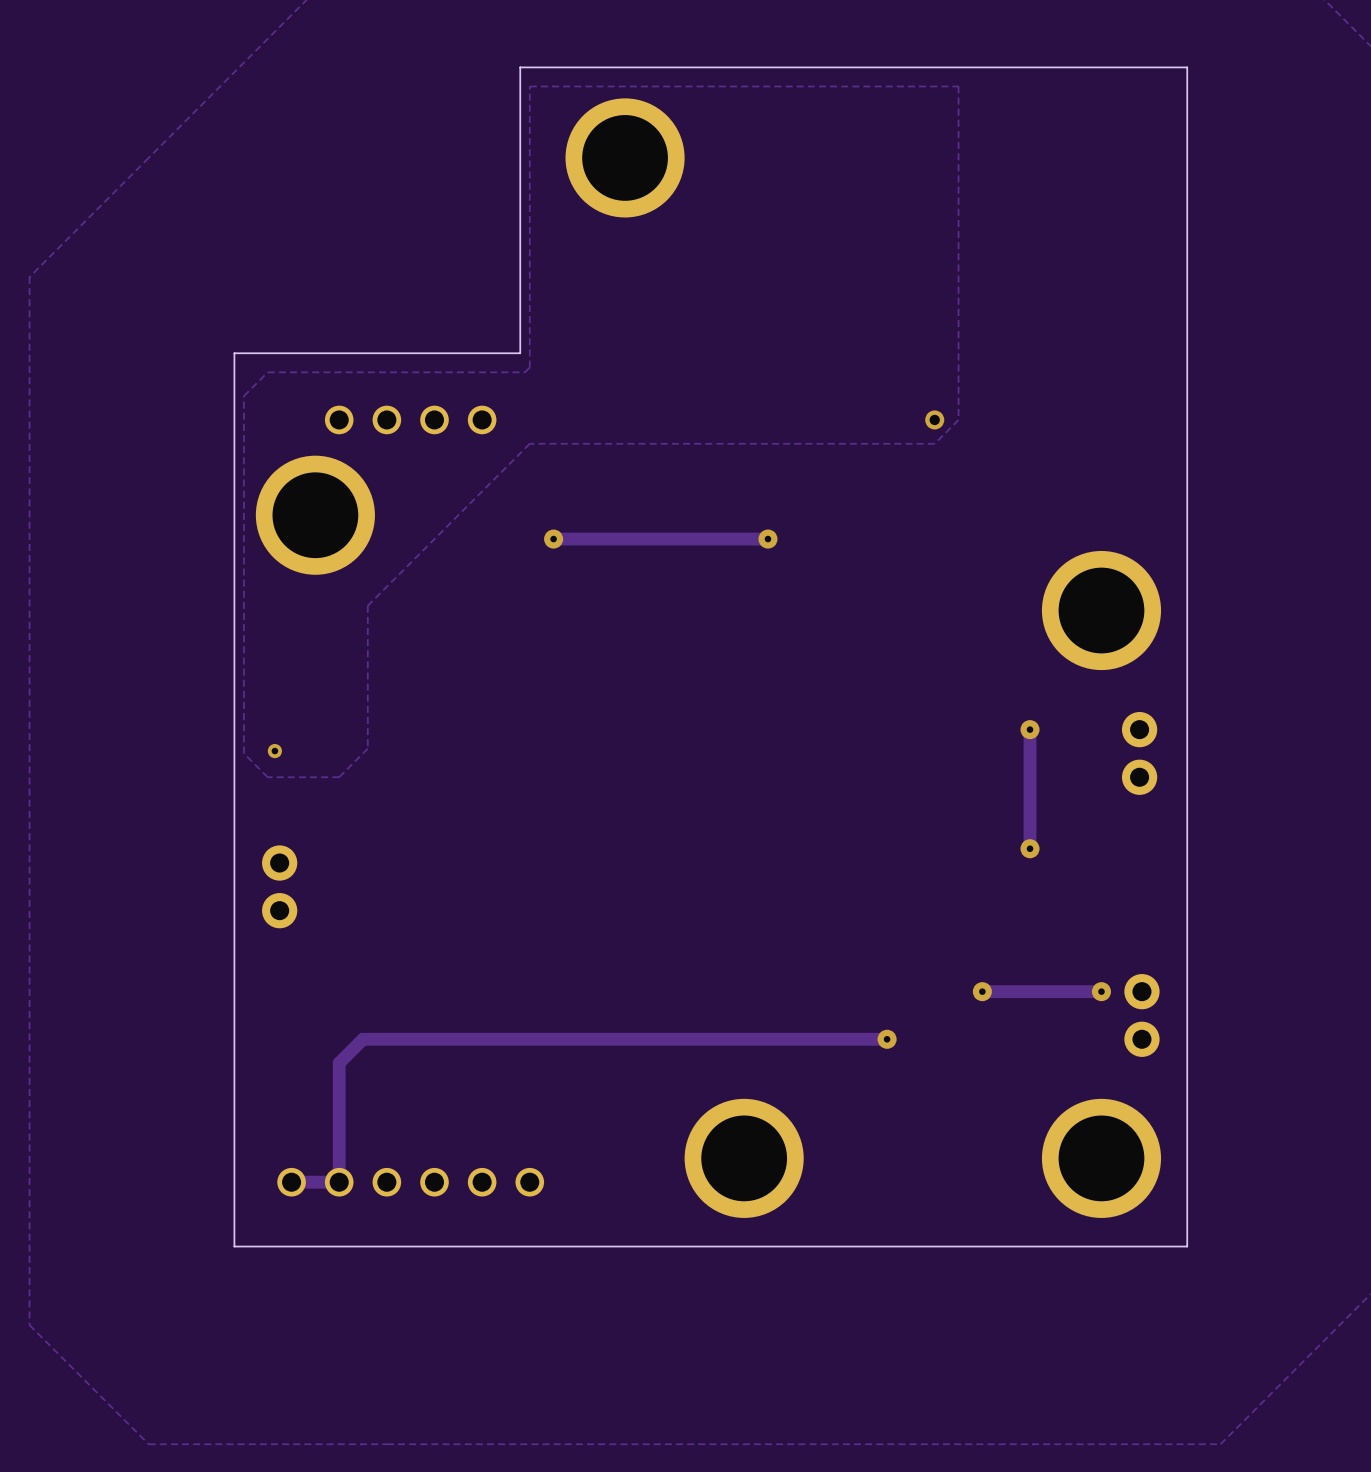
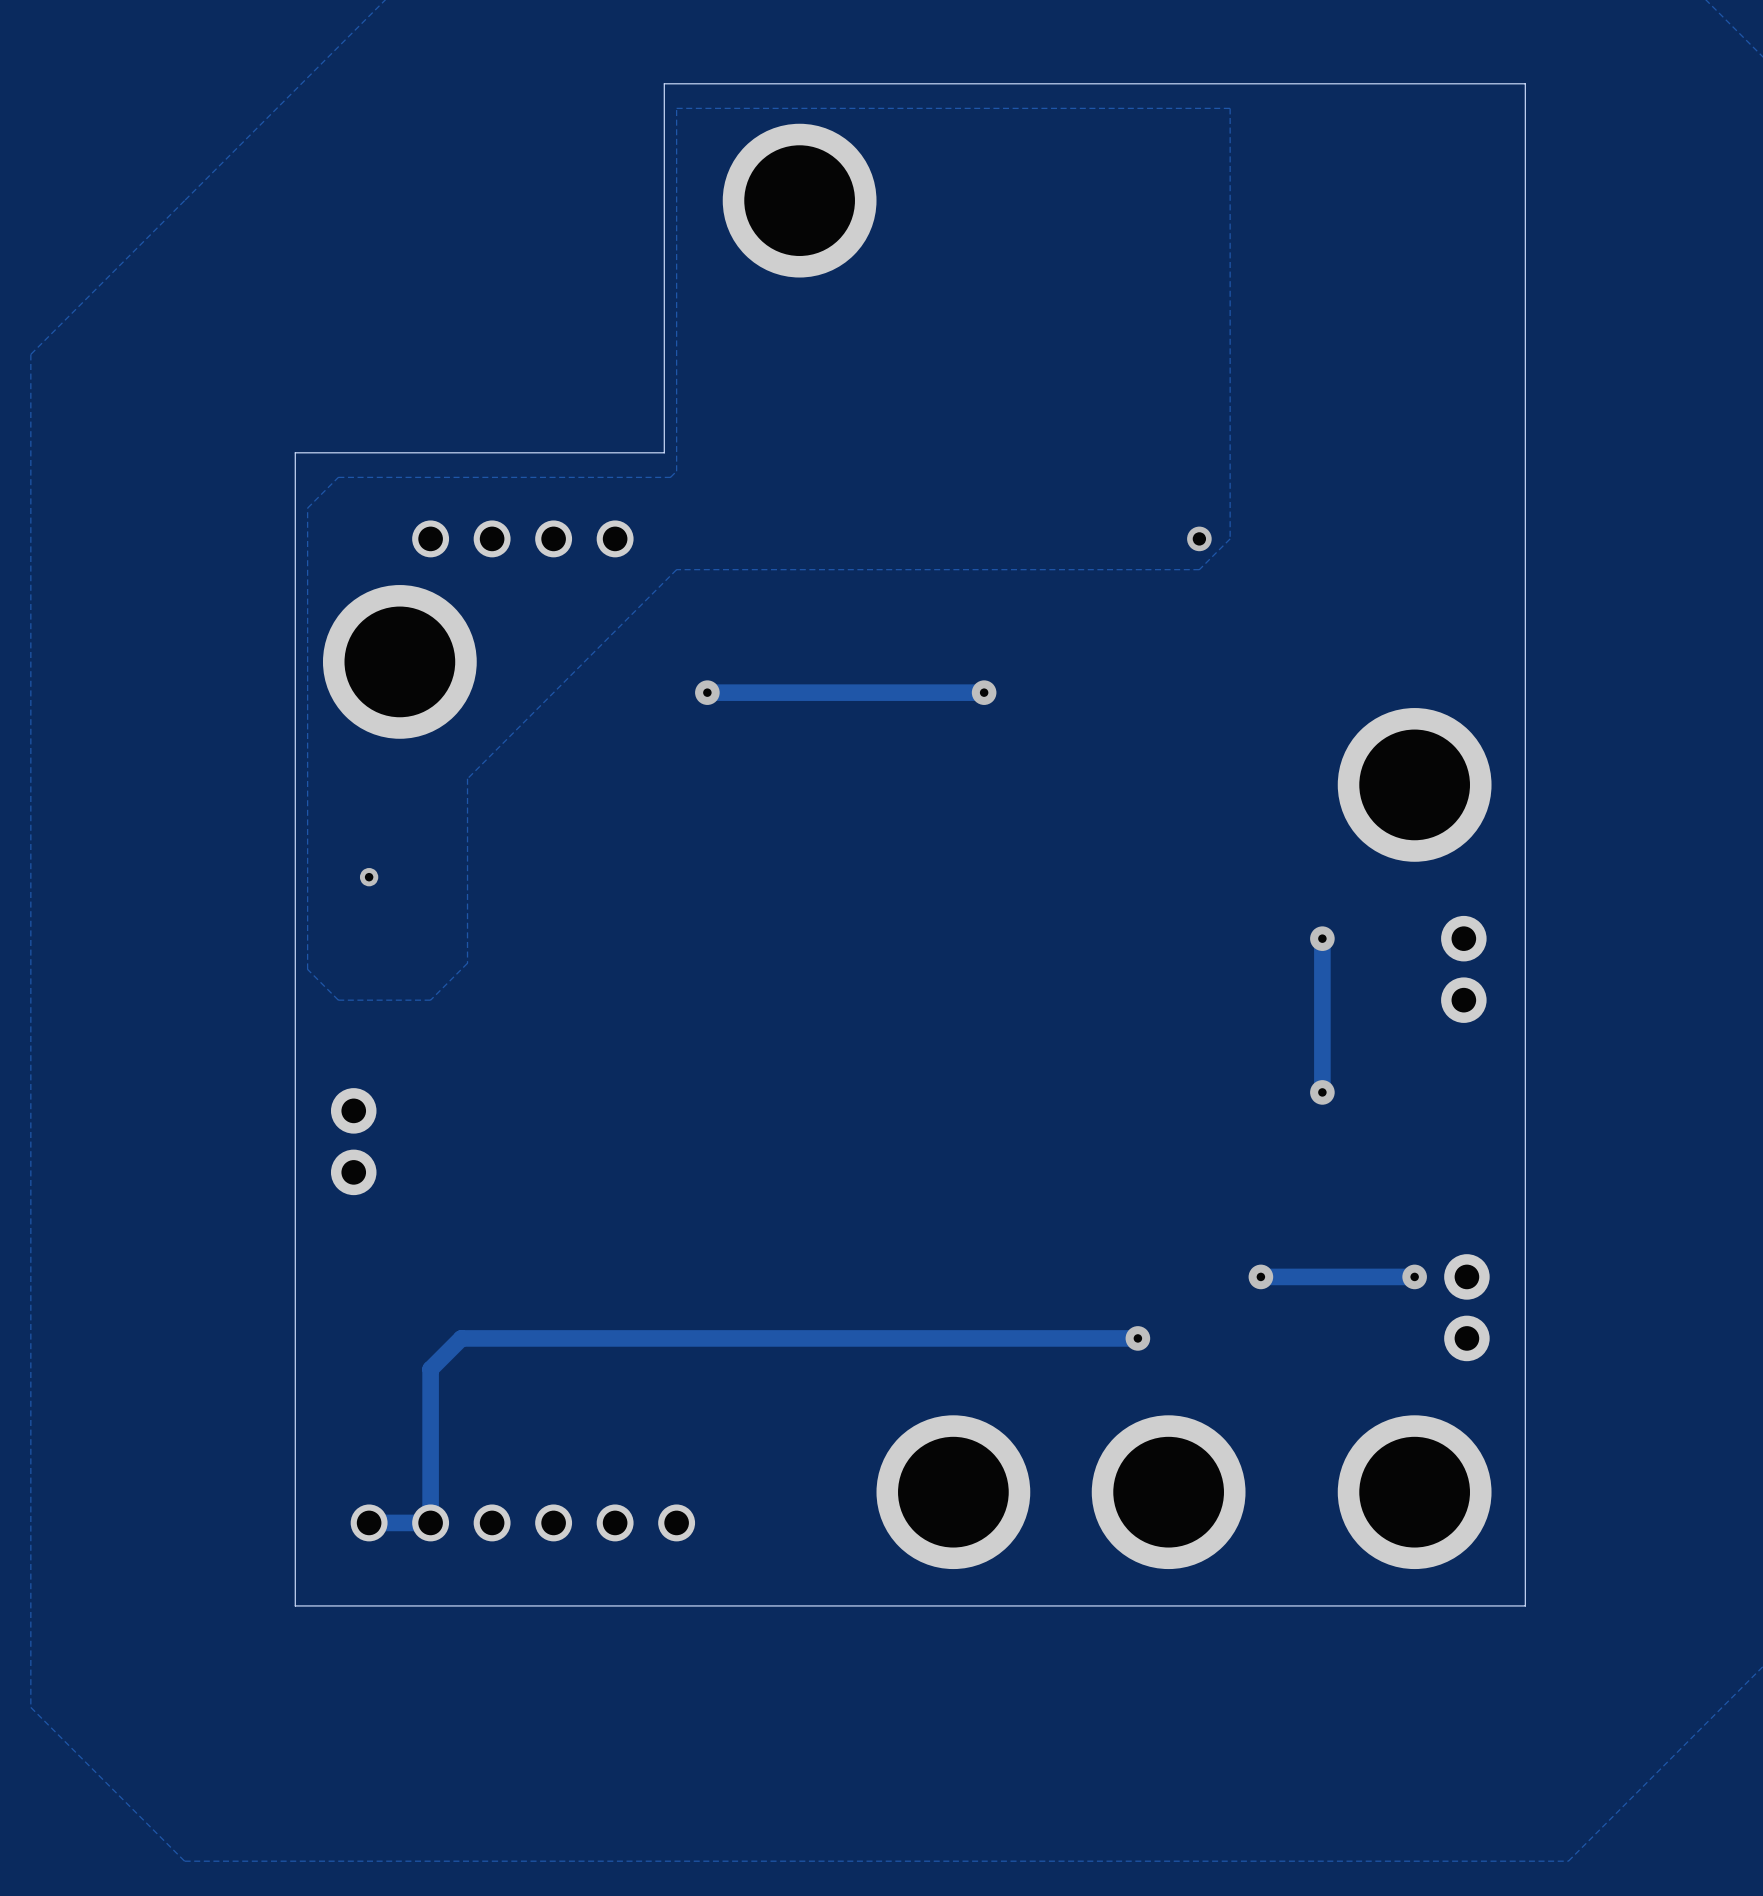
via position: (274, 751) -> (369, 877)
part: none -> (1168, 1492)

